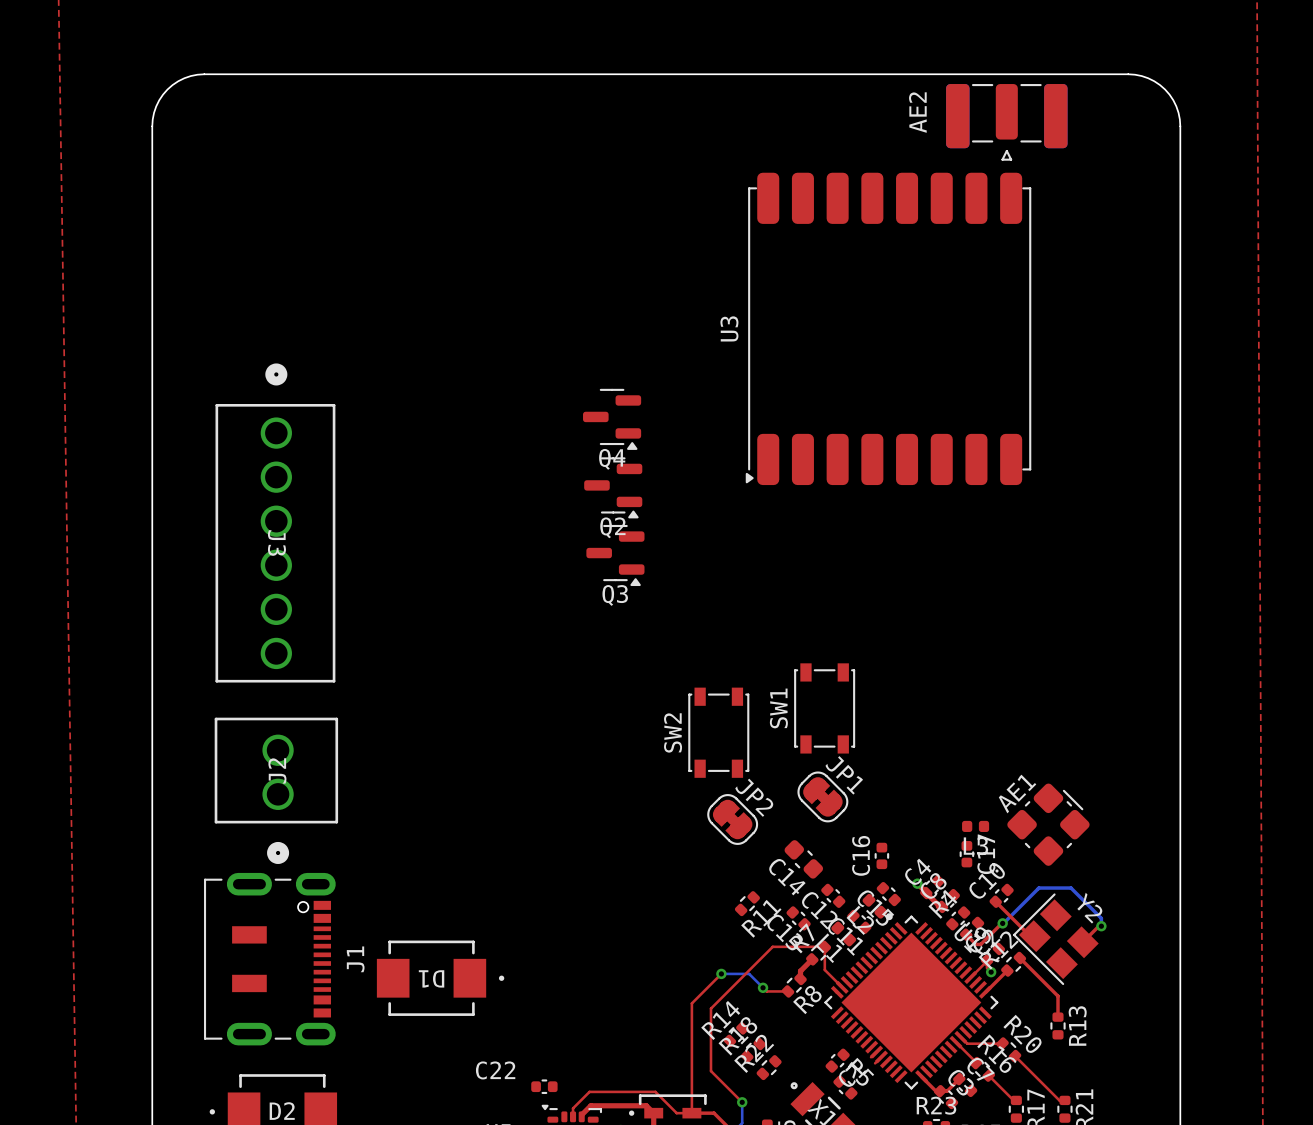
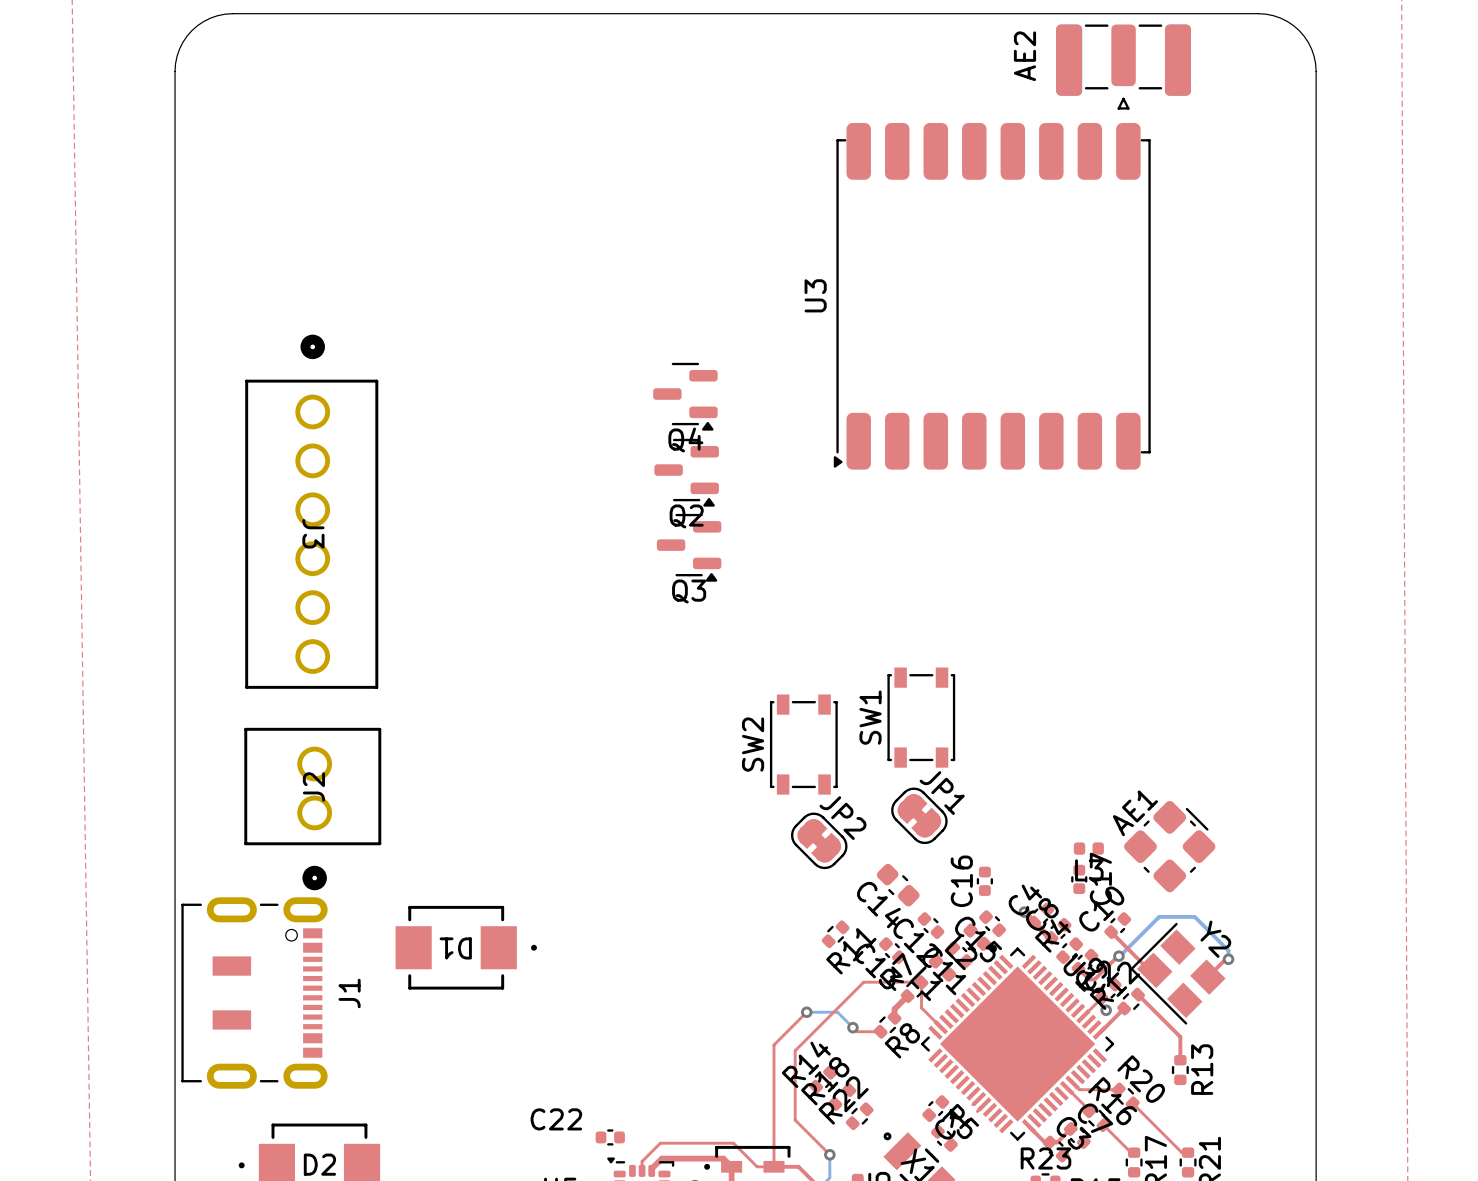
J1 position: (269, 959) -> (254, 993)
D1 position: (440, 978) -> (466, 947)

